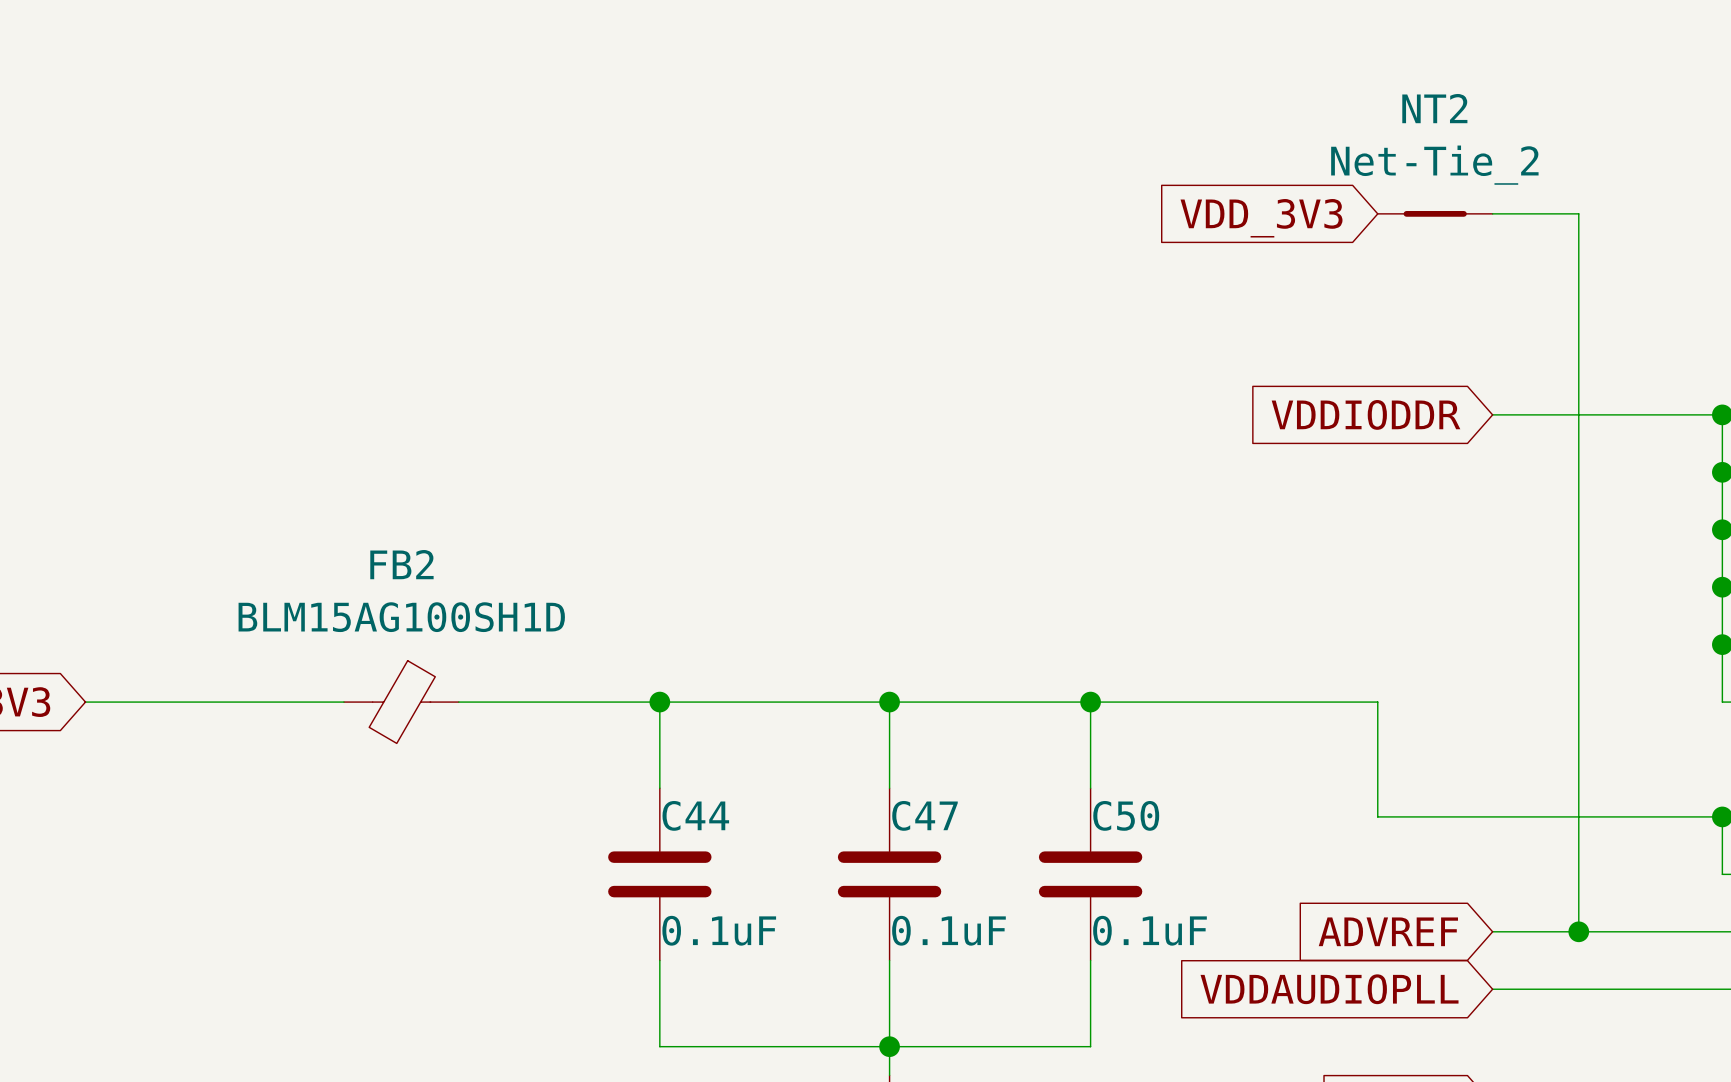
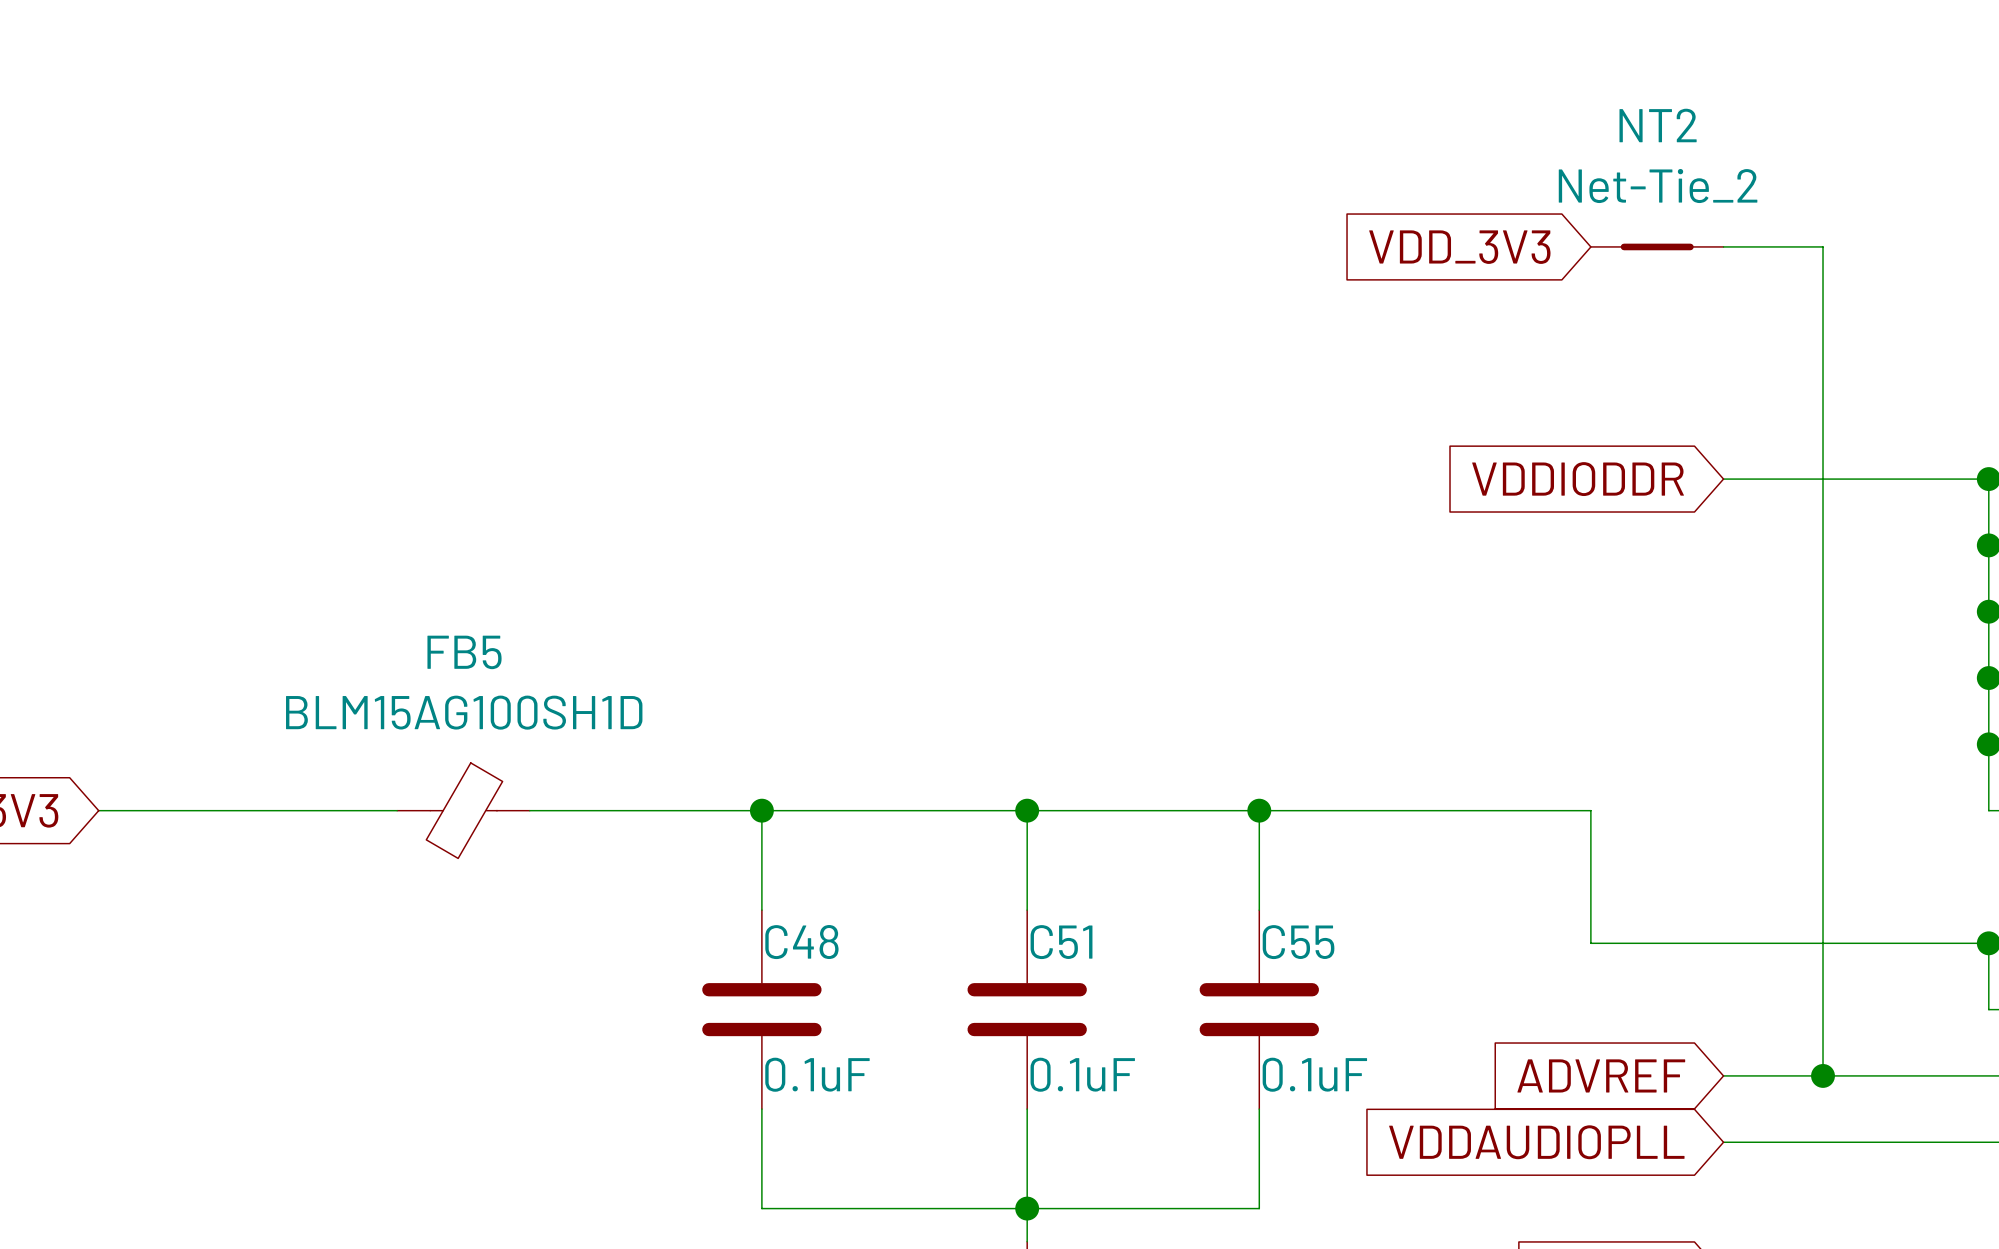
FB2 name: FB2 (401, 564) -> FB5 (464, 652)
C44 name: C44 (695, 815) -> C48 (801, 942)
C47 name: C47 (925, 815) -> C51 (1061, 942)
C50 name: C50 (1126, 815) -> C55 (1298, 942)

